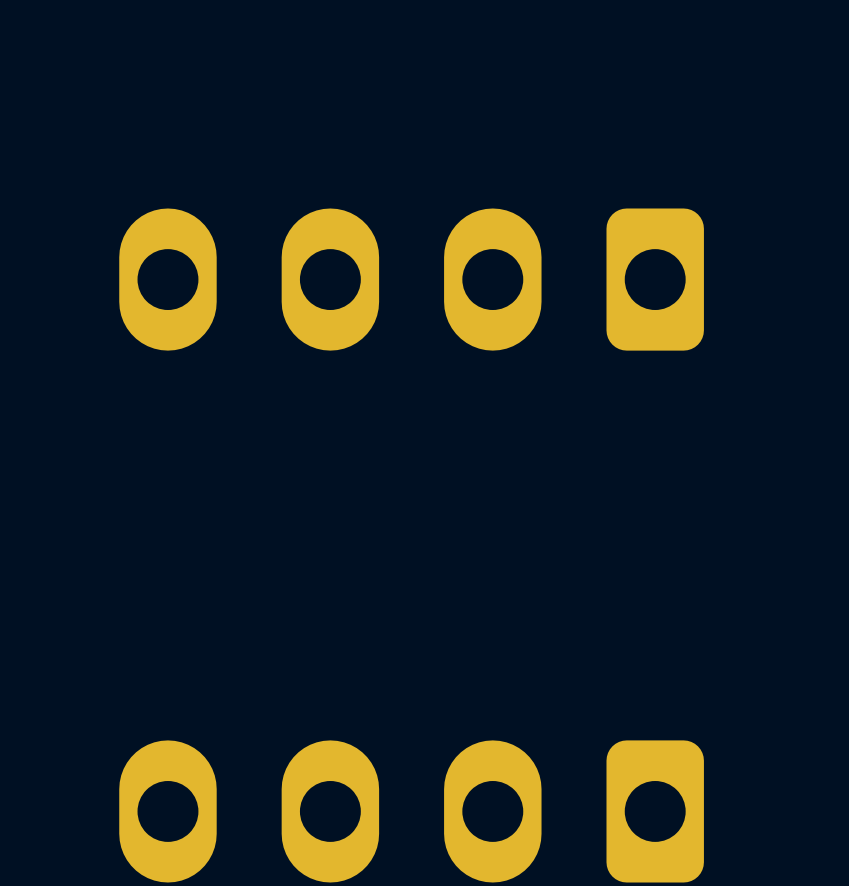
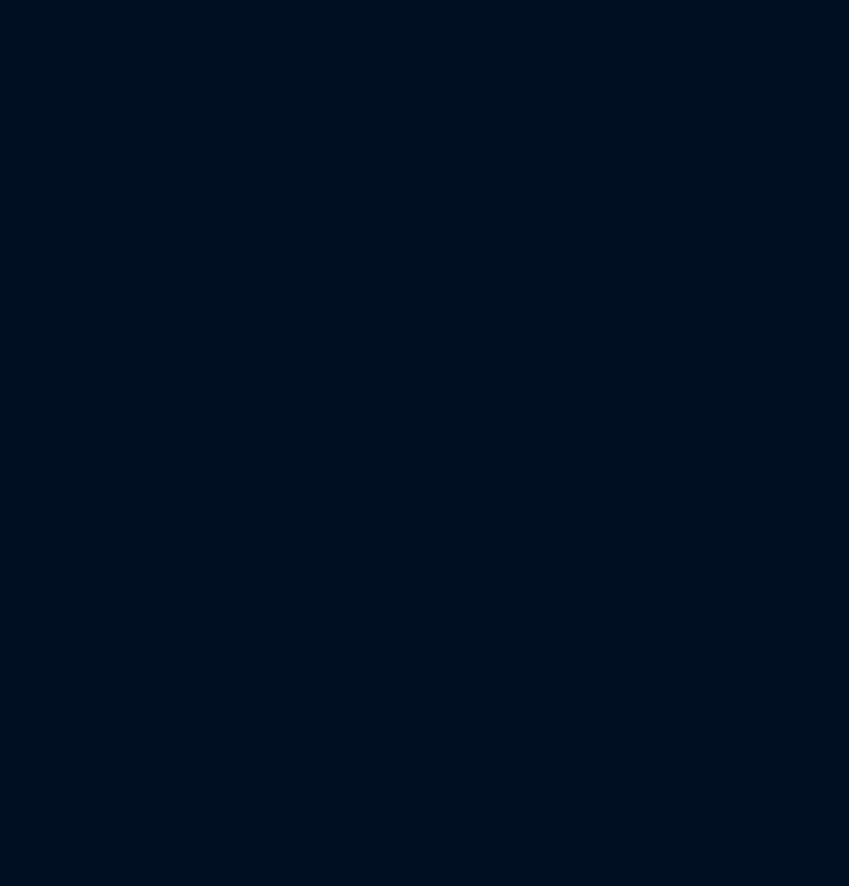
part: (411, 279) -> none
part: (411, 811) -> none

